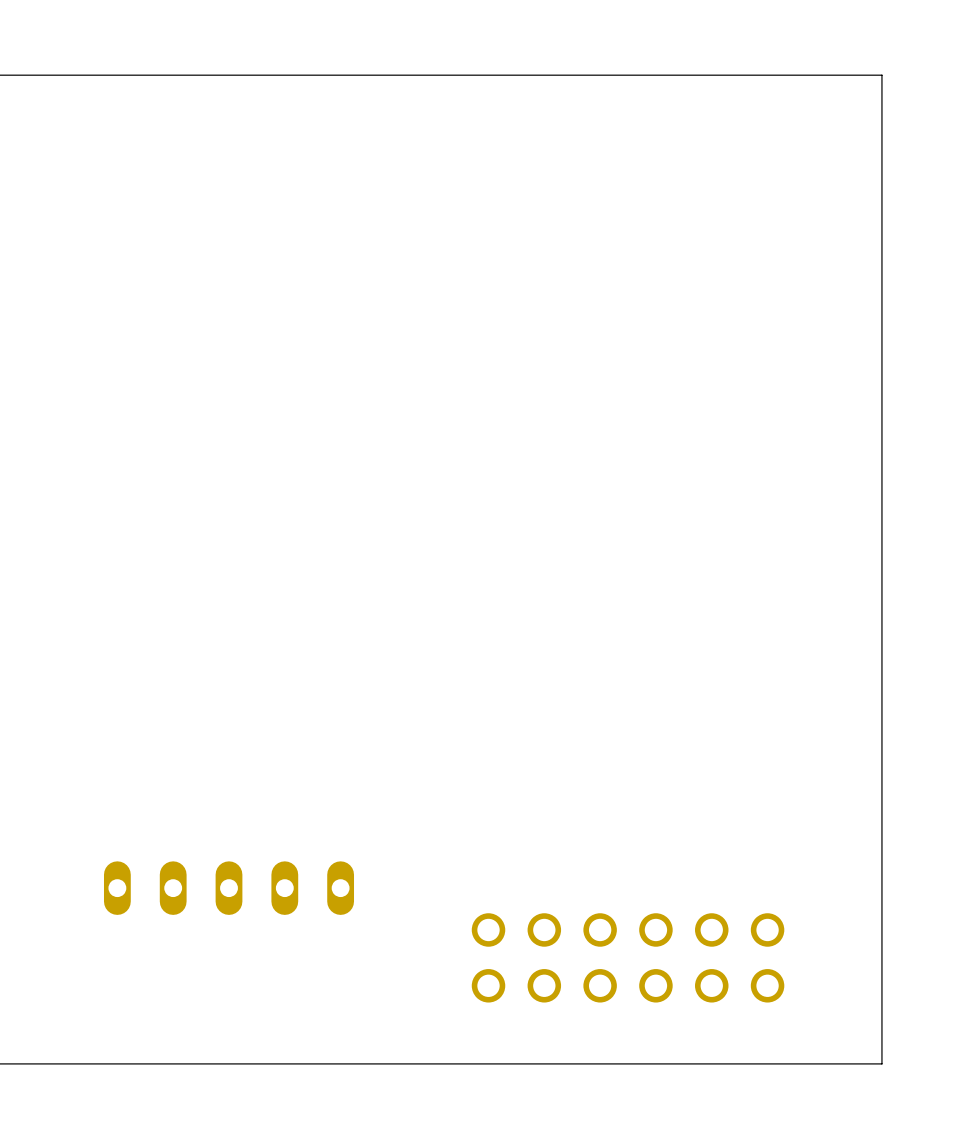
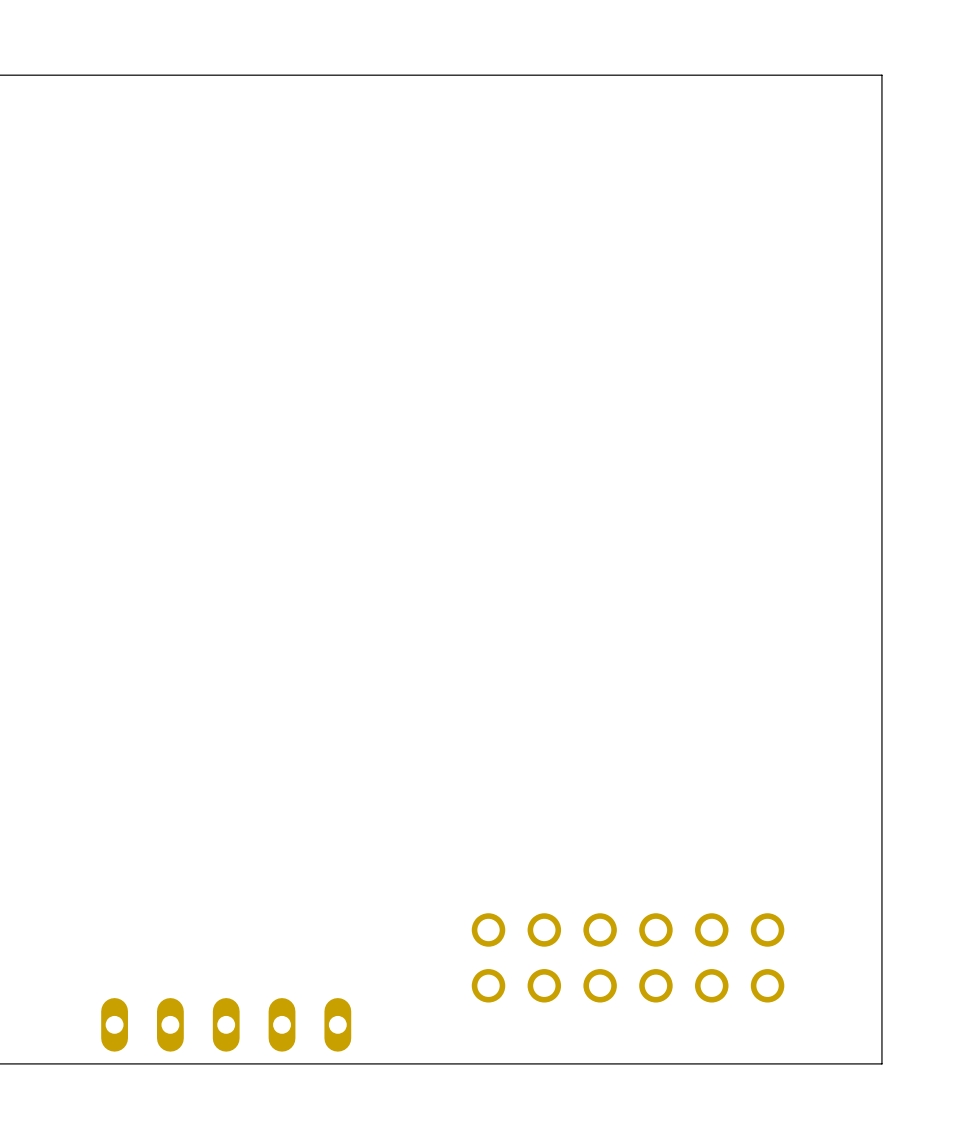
part position: (229, 888) -> (226, 1024)

